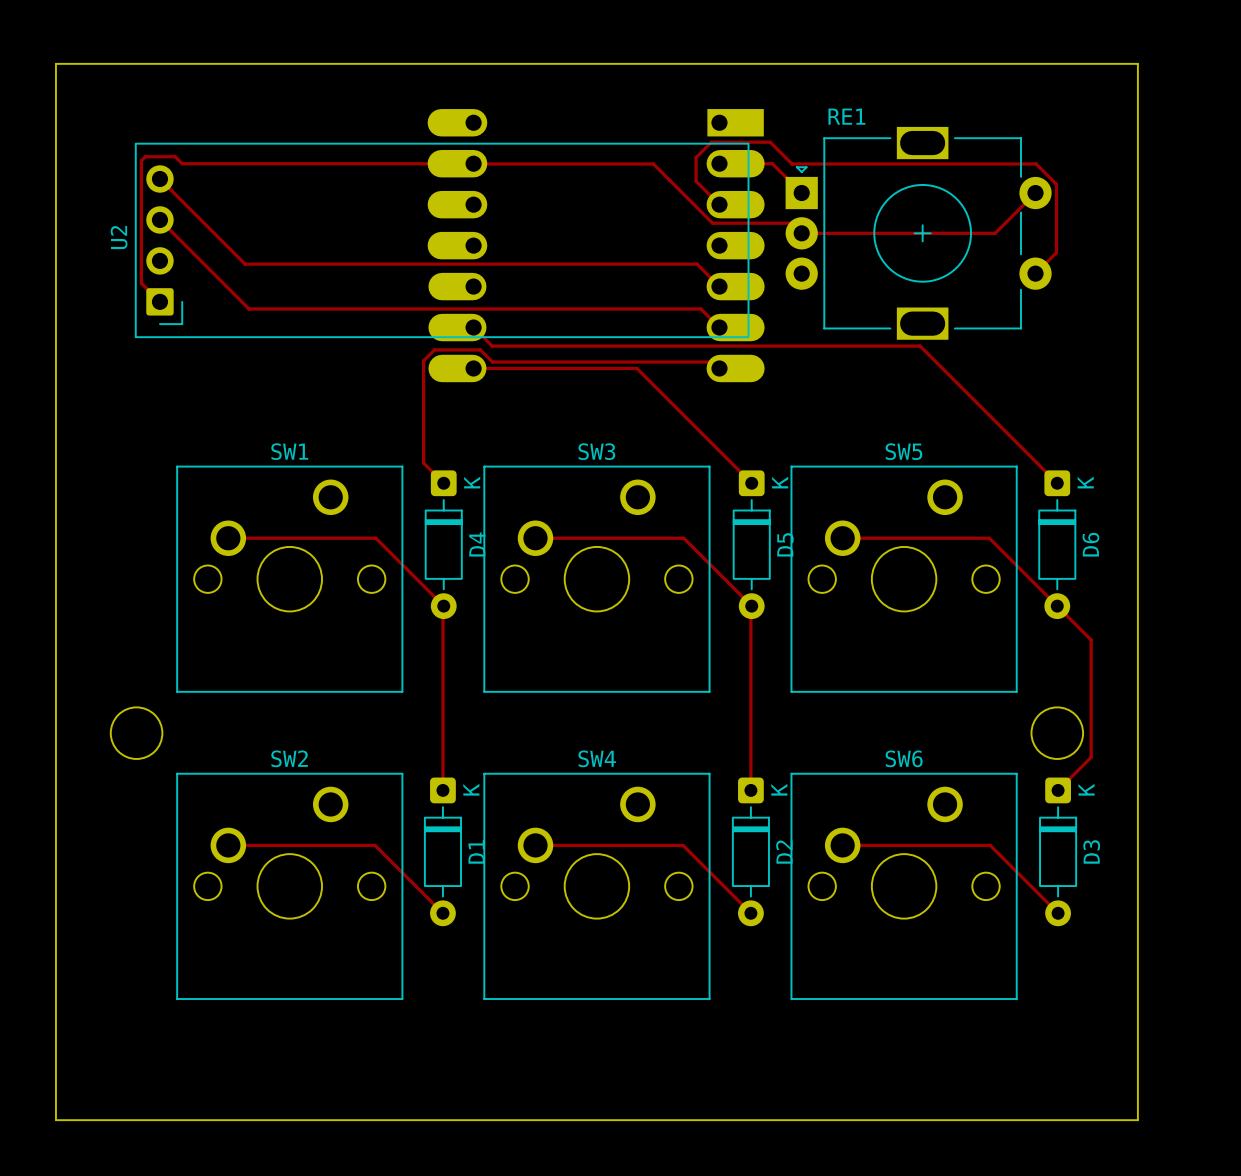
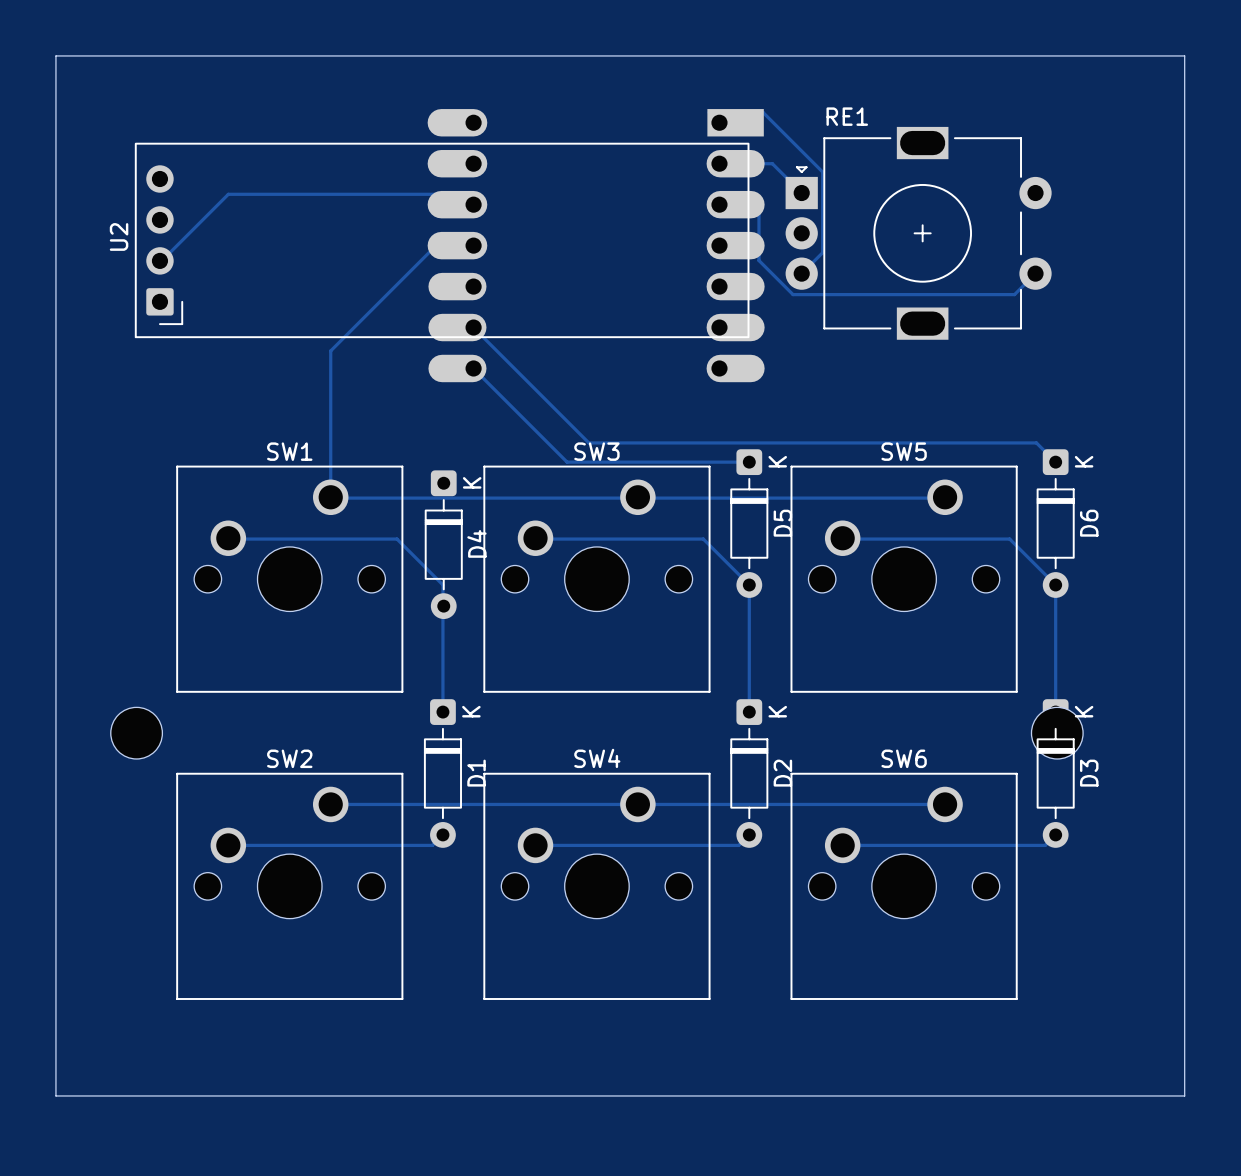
board edge: (55, 63) (1137, 63) (1137, 1120) (55, 1120) (55, 1095) -> (55, 63) (55, 55) (1184, 55) (1184, 1095) (55, 1095)
track: none -> (709, 112) (763, 112) (822, 172) (822, 252) (801, 273)
track: (159, 178) (245, 264) (697, 264) (719, 286) -> none
track: (1035, 193) (995, 233) (801, 233) (791, 223) (712, 223) (653, 164) (182, 163) (175, 156) (145, 156) (141, 160) (141, 283) (159, 301) -> none
track: none -> (463, 194) (228, 194) (160, 261)
track: (719, 204) (696, 181) (696, 157) (711, 142) (770, 142) (792, 164) (1036, 164) (1056, 184) (1056, 252) (1035, 273) -> (750, 194) (758, 202) (758, 260) (793, 294) (1014, 294) (1035, 273)
track: (159, 219) (249, 308) (700, 308) (719, 327) -> none
track: none -> (446, 235) (330, 350) (330, 498) (941, 498)
track: none -> (463, 317) (588, 442) (1036, 442) (1055, 462)
track: (473, 327) (492, 346) (920, 346) (1057, 483) -> none
track: none -> (463, 358) (567, 462) (749, 462)
track: (473, 368) (636, 368) (751, 483) -> none
track: (719, 368) (713, 362) (492, 362) (480, 349) (434, 349) (423, 360) (423, 463) (443, 483) -> none
track: (228, 538) (375, 538) (442, 606) -> (228, 539) (396, 539) (442, 585) (442, 606)
track: (535, 538) (683, 538) (751, 606) (750, 790) -> none
track: (842, 538) (989, 538) (1091, 639) (1091, 757) (1058, 790) -> none
track: none -> (534, 539) (703, 539) (749, 585) (749, 712)
track: none -> (839, 539) (1009, 539) (1055, 585) (1055, 712)
D5 position: (751, 544) -> (749, 523)
D6 position: (1057, 544) -> (1055, 523)
track: (442, 712) (442, 790) -> none
track: none -> (330, 804) (941, 804)
track: (375, 845) (442, 913) -> (375, 845) (432, 845) (442, 834)
track: (683, 845) (750, 913) -> (683, 845) (738, 845) (749, 834)
track: (990, 845) (1058, 913) -> (990, 845) (1045, 845) (1055, 834)
D1 position: (442, 851) -> (442, 773)
D2 position: (750, 851) -> (749, 773)
D3 position: (1058, 851) -> (1055, 773)

